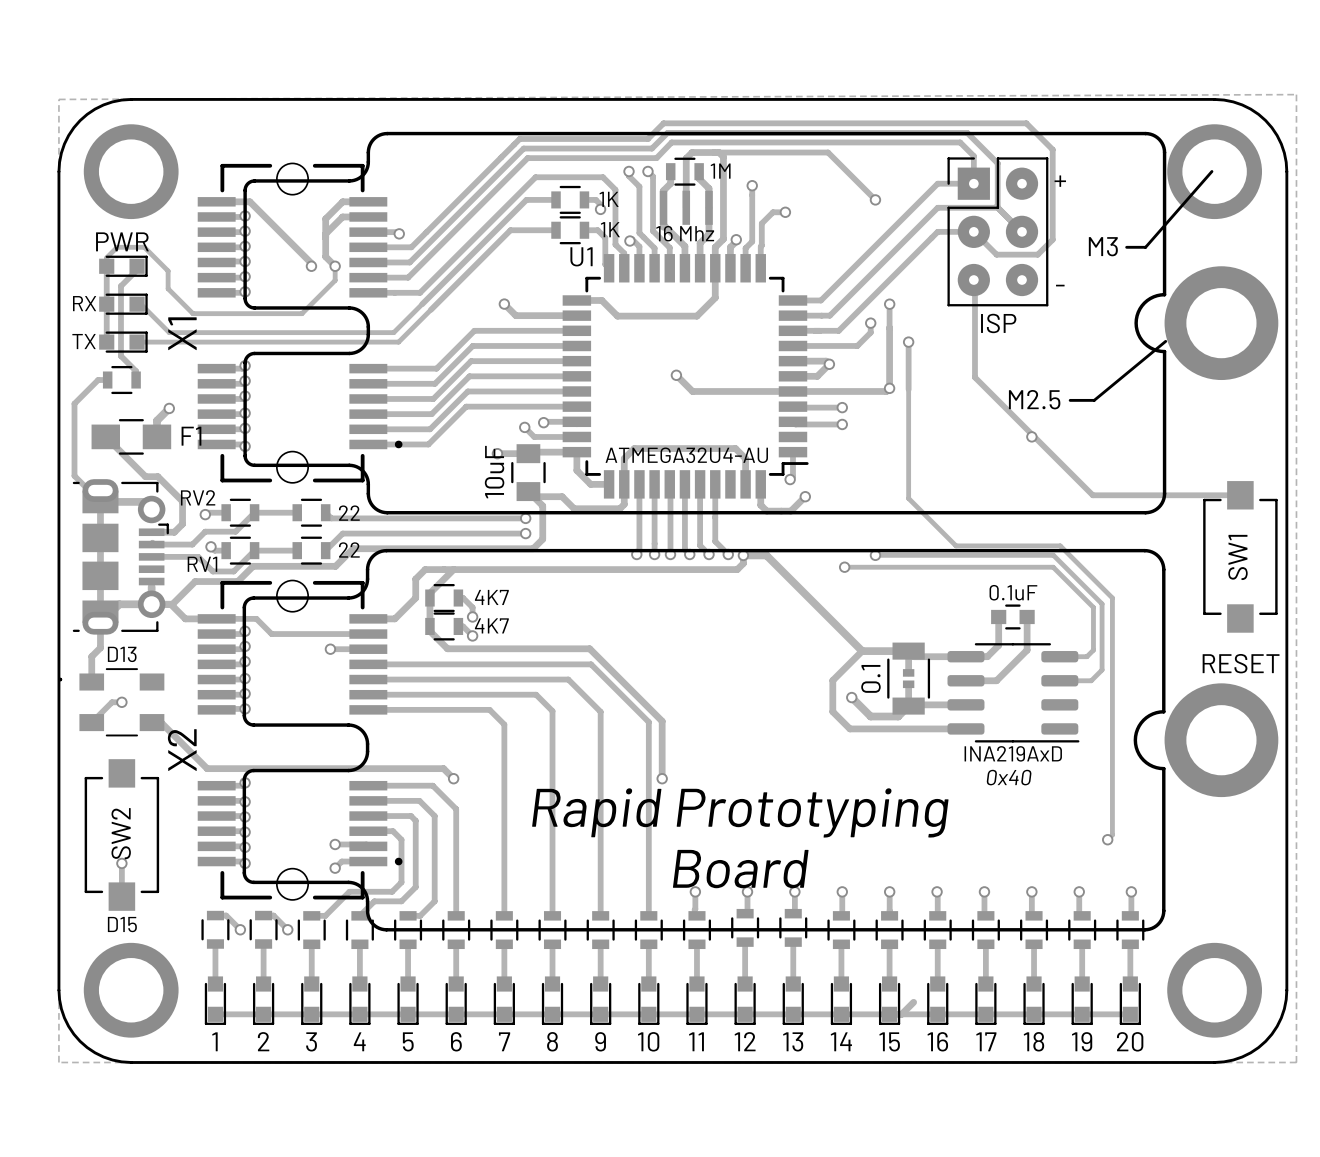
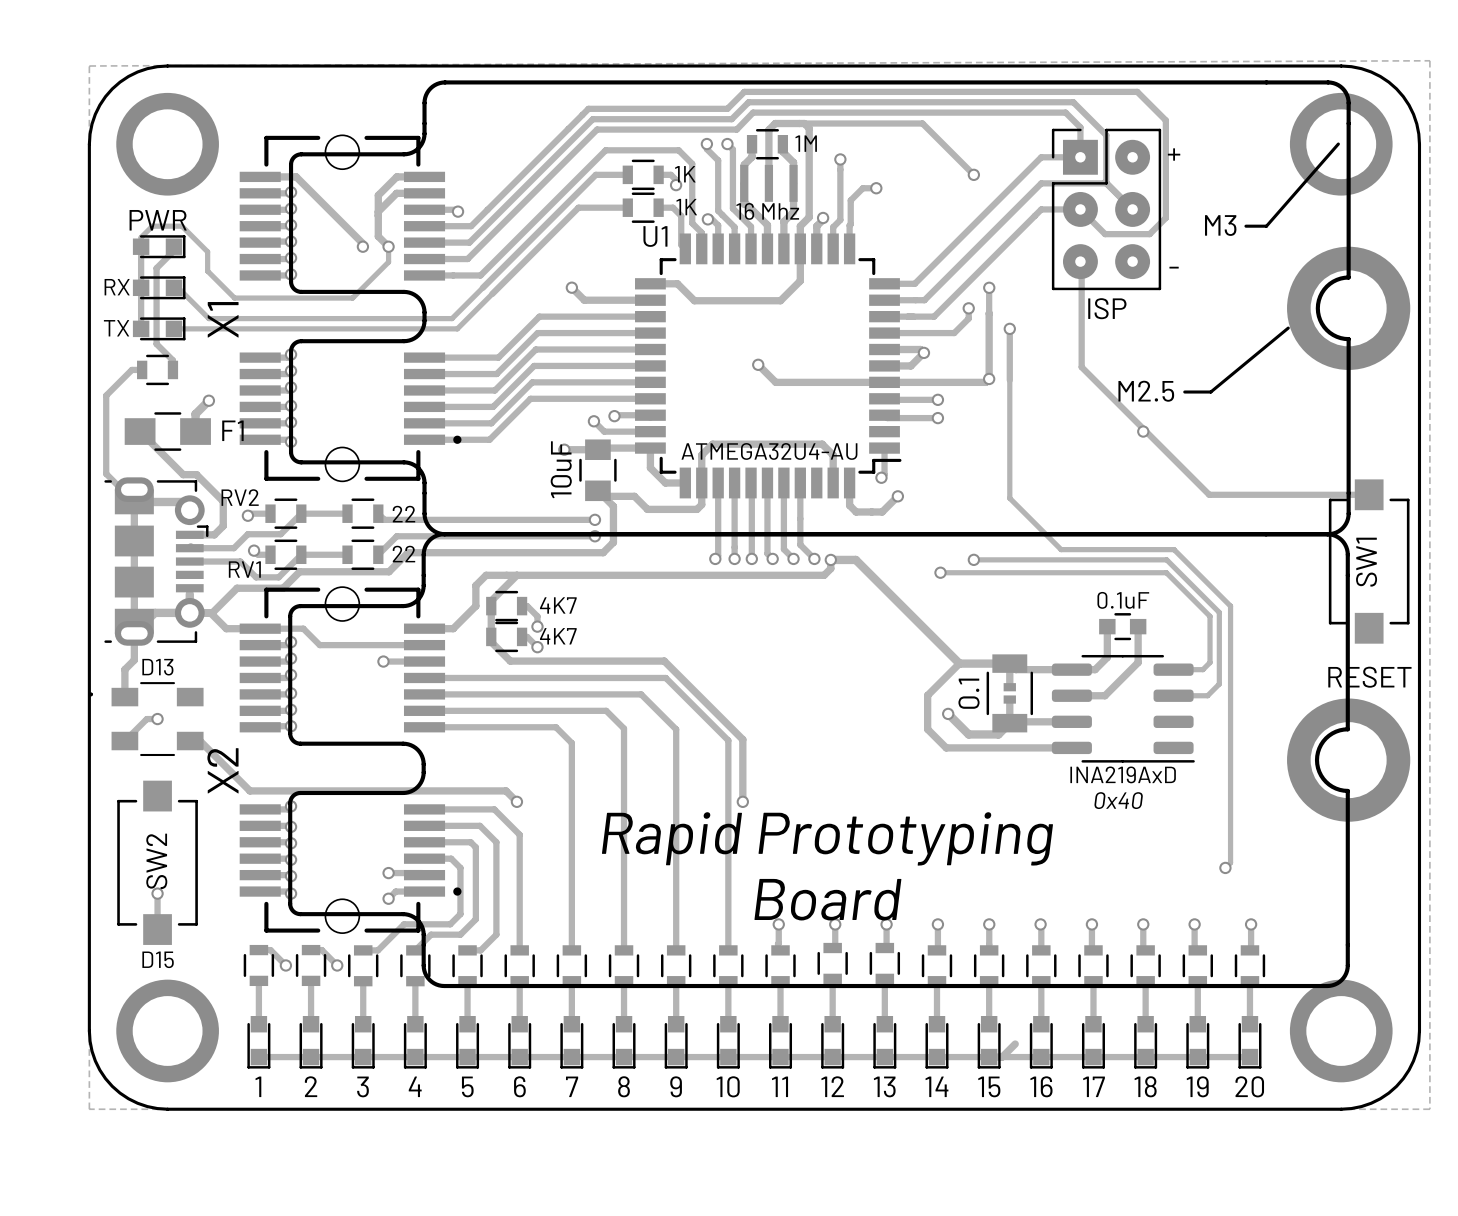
drawing: none -> [288, 80, 1351, 989]
drawing: [243, 131, 1167, 515] -> none
drawing: [242, 548, 1166, 932] -> none

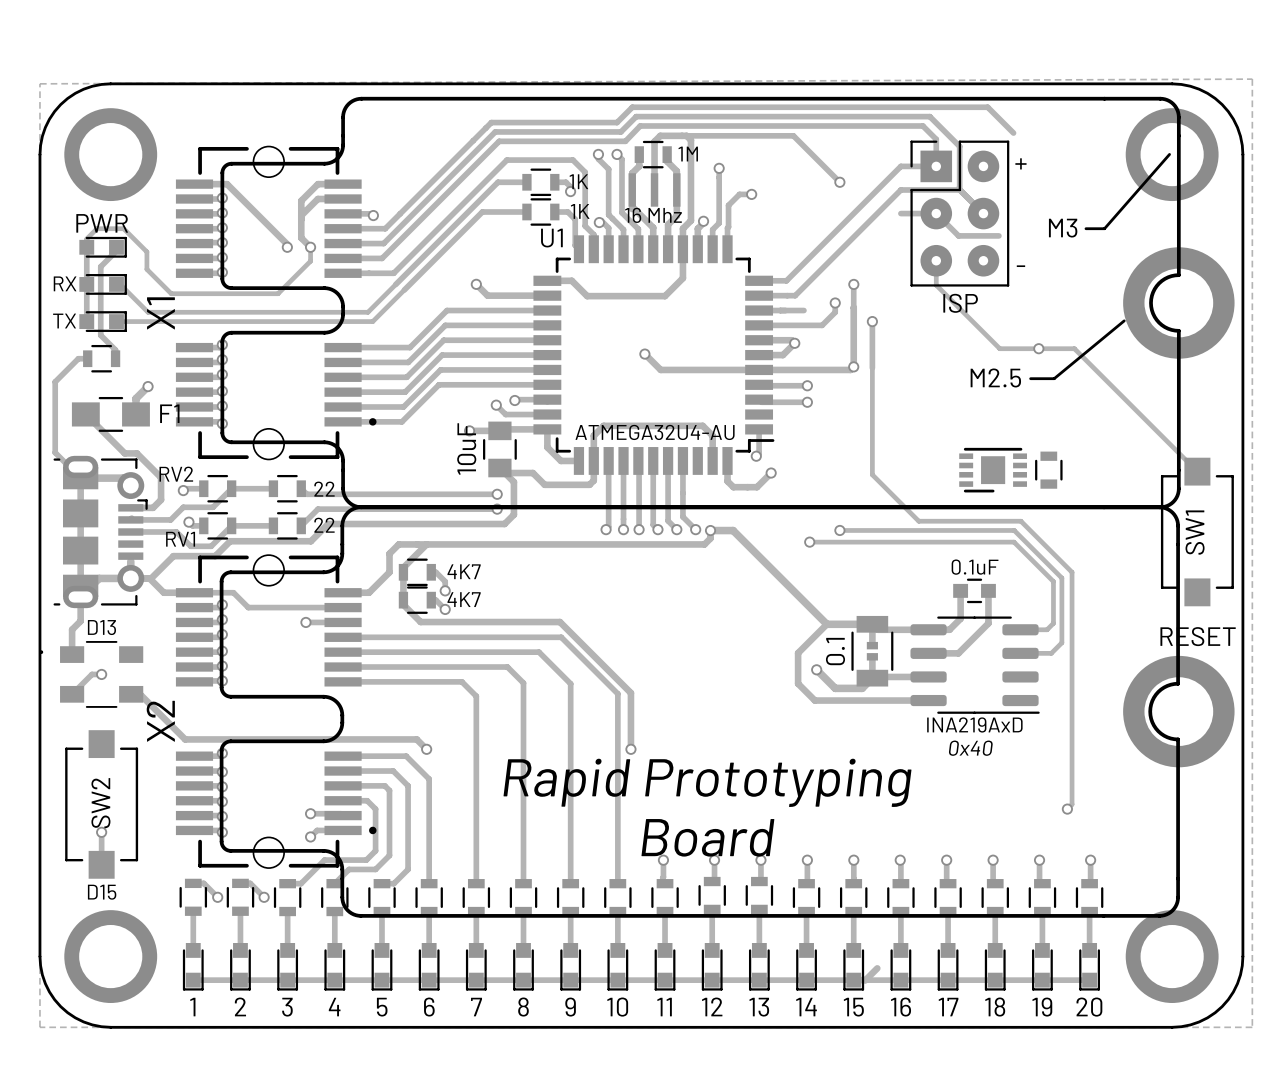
track: (1165, 120) (1165, 217) (1149, 234) -> none
track: (1041, 209) (934, 316) -> none
track: (1080, 261) (1081, 367) (1209, 494) (1369, 494) -> (936, 260) (936, 285) (999, 348) (1074, 348) (1197, 471)
via position: (1143, 431) -> (1038, 348)
part: none -> (993, 470)
part: none -> (1048, 470)

